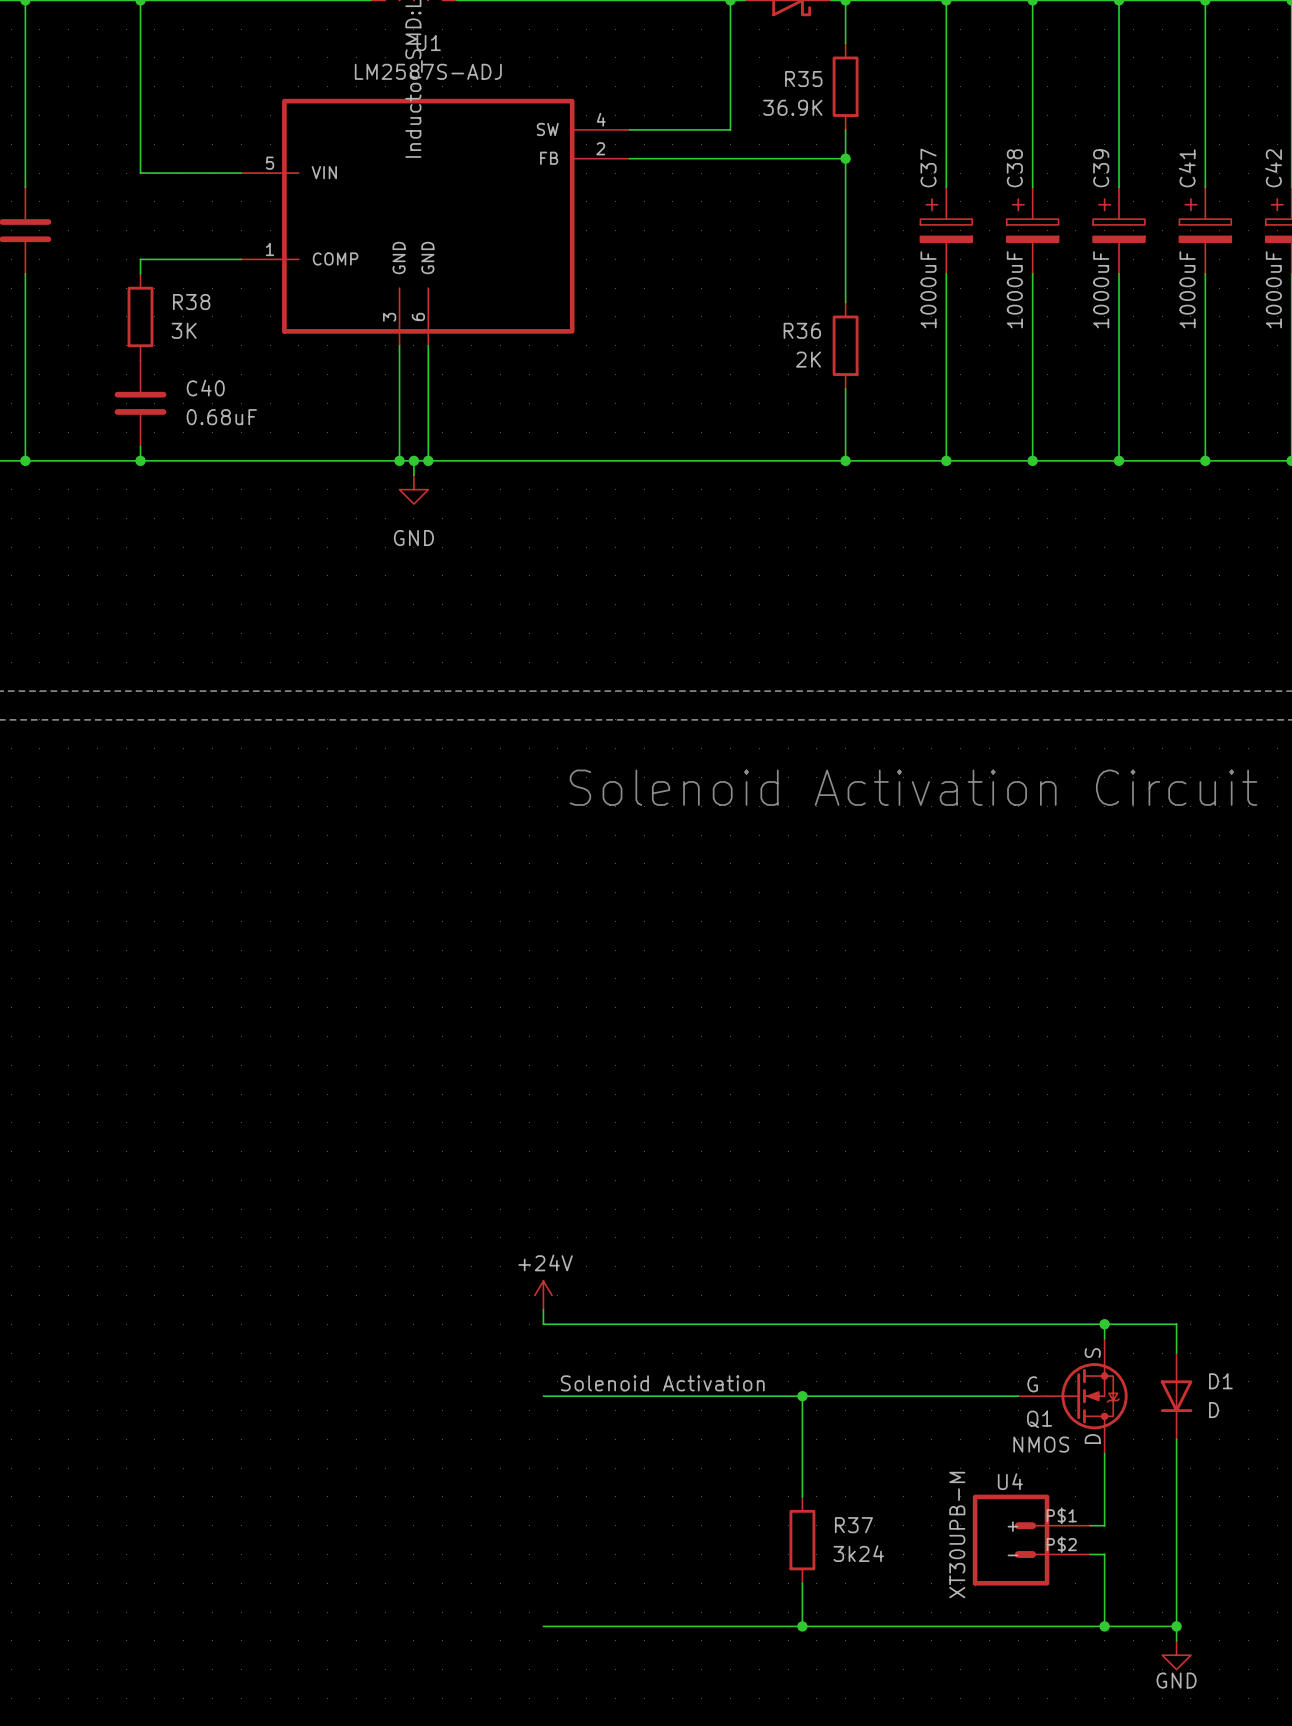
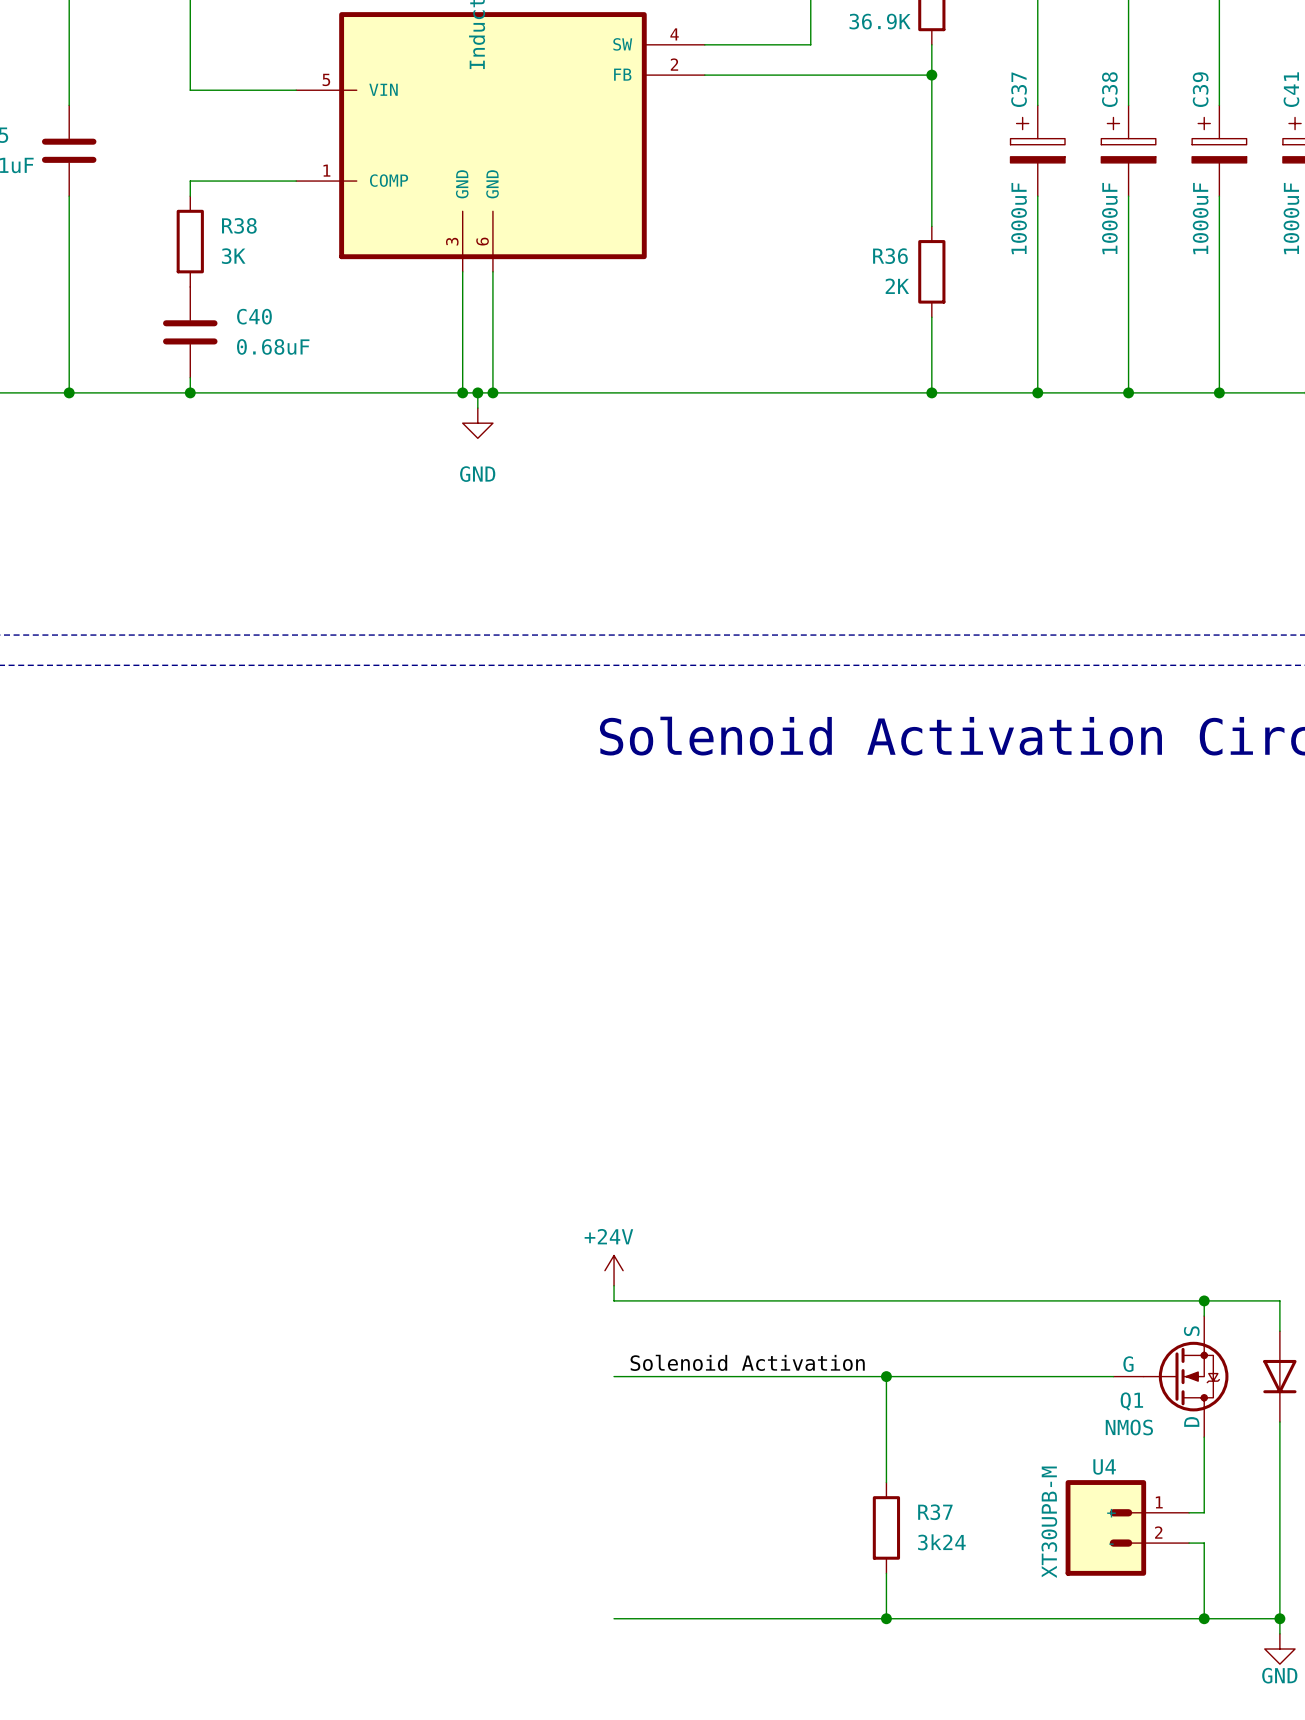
U4 pin number: P$1 (1061, 1515) -> 1 (1159, 1502)
U4 pin number: P$2 (1061, 1544) -> 2 (1158, 1532)

